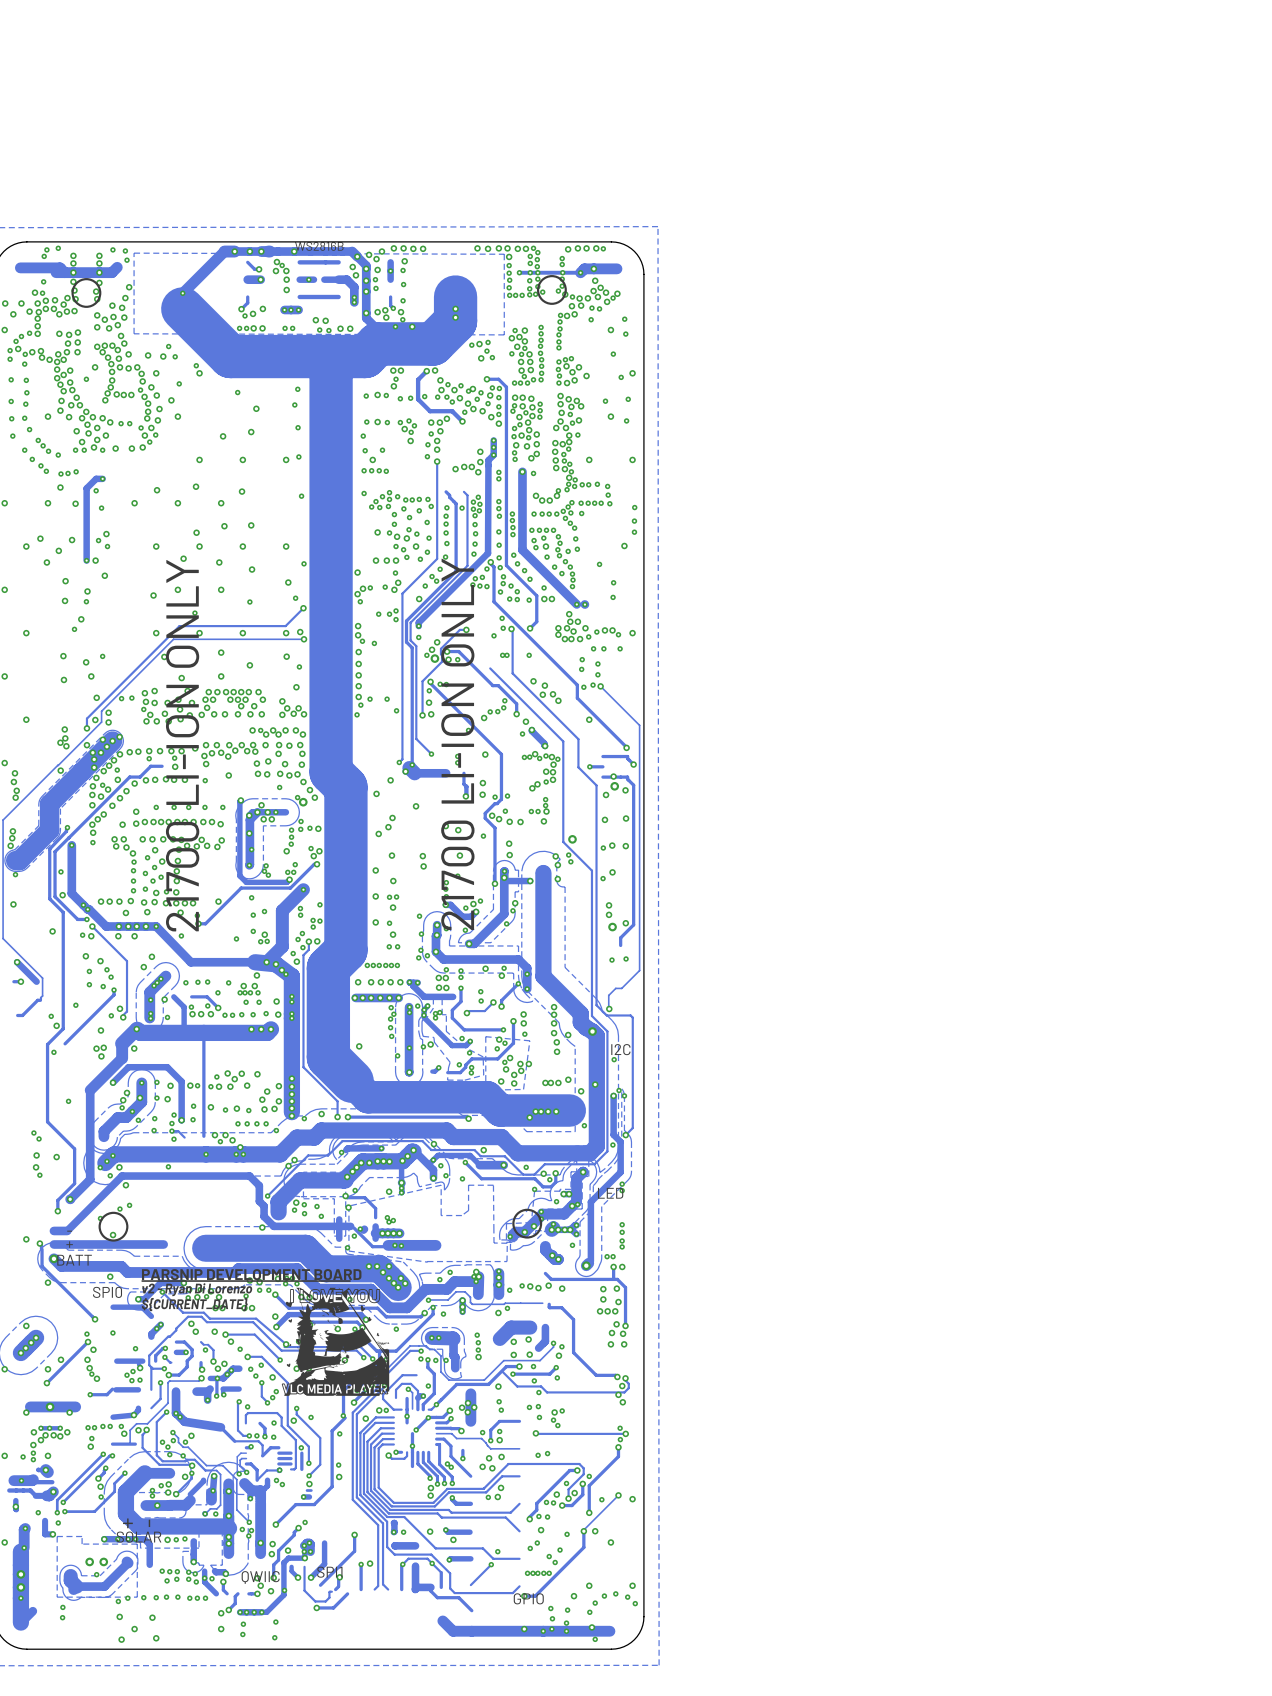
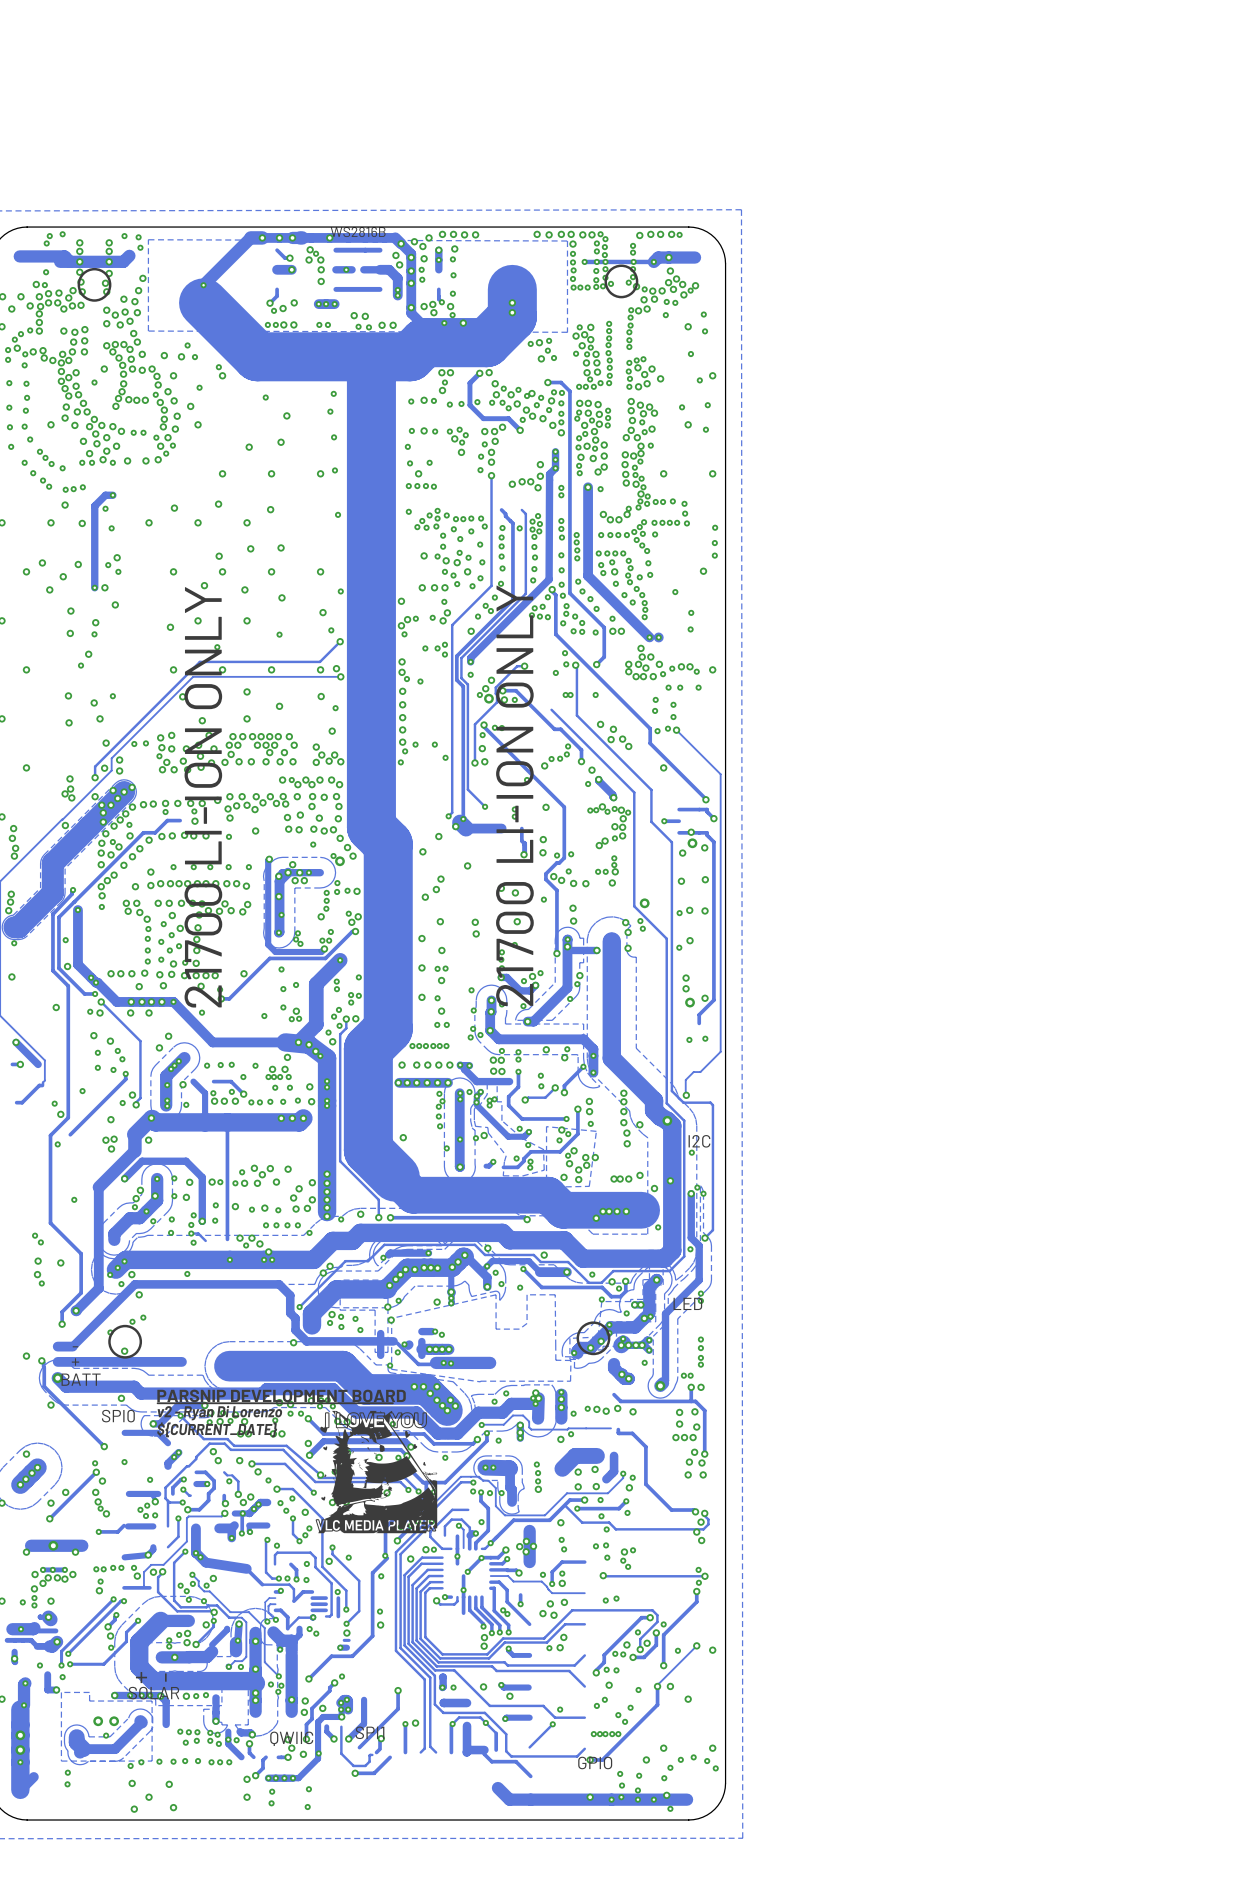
via: none -> (438, 250)
track: (345, 1196) (364, 1197) (375, 1208) (375, 1217) -> (432, 1331) (421, 1331)
via: (388, 1222) -> none
via: none -> (160, 1696)
via: none -> (653, 1799)

